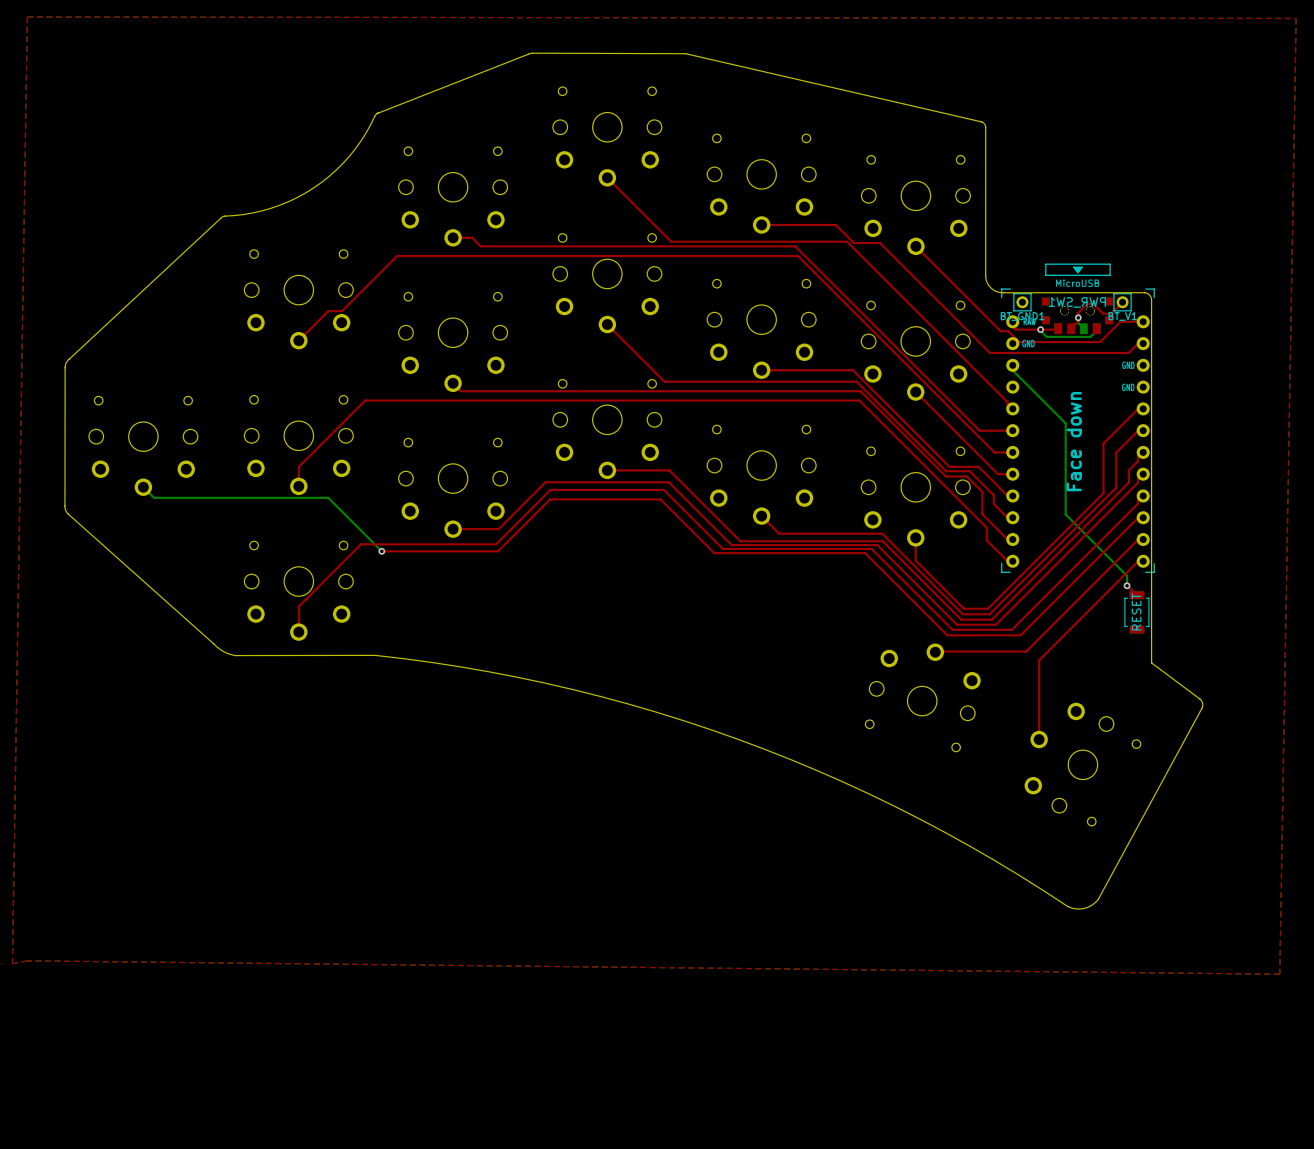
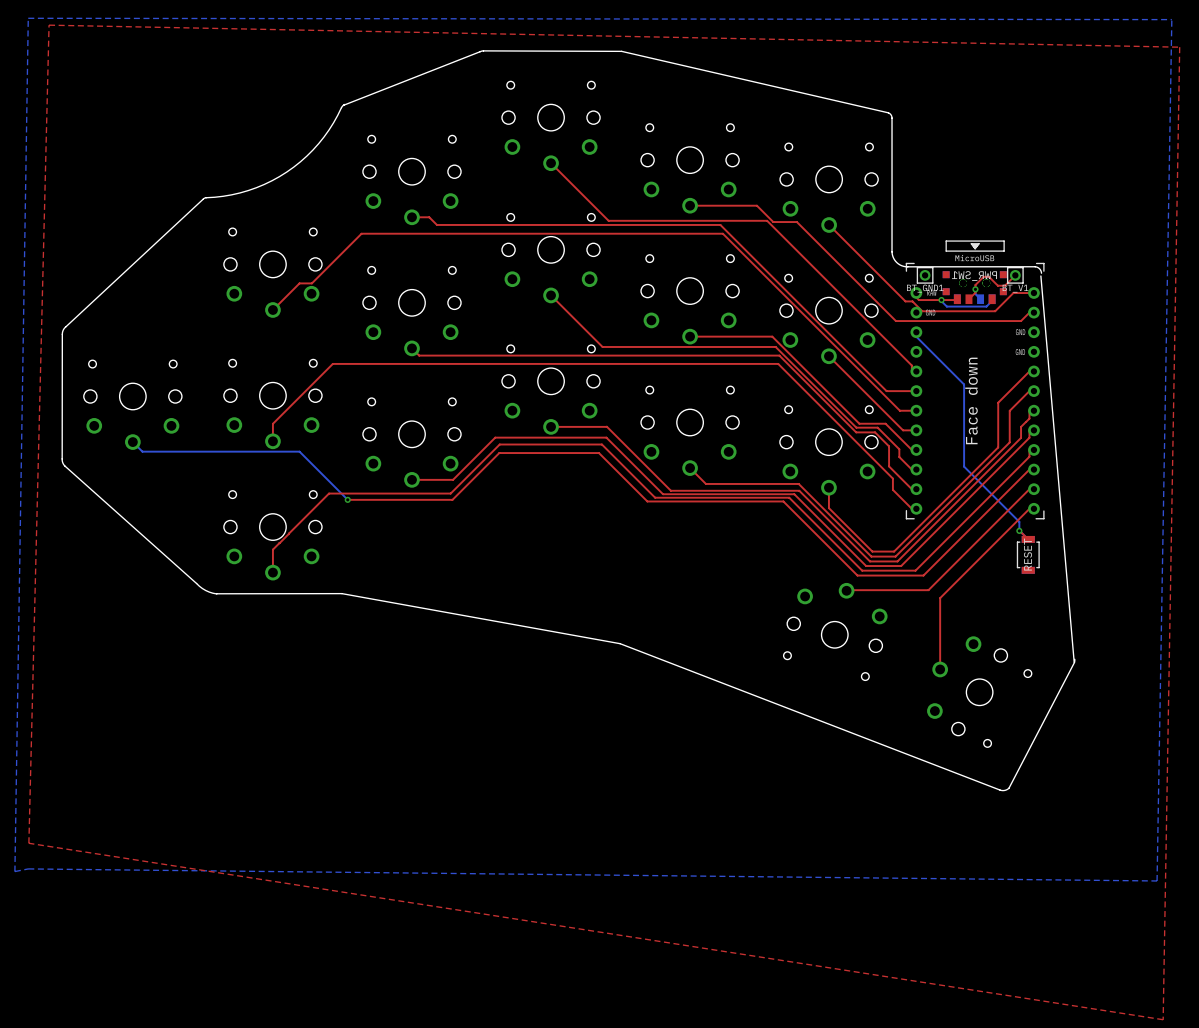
top zone outline: (27, 17) (12, 963) (27, 960) (1279, 974) (1296, 18) (27, 17) -> (49, 25) (28, 843) (1163, 1019) (1179, 47) (49, 25)
board edge: (1151, 299) (1151, 662) (1200, 699) -> none
board edge: none -> (1040, 275) (1074, 662)
board edge: (375, 655) (460, 666) (572, 689) (655, 711) (736, 738) (816, 770) (920, 819) (995, 860) (1067, 906) -> (341, 593) (620, 643) (1001, 790) (1008, 788) (1074, 659)
board edge: (1200, 699) (1202, 703) (1201, 708) (1098, 899) (1084, 908) (1067, 906) -> none

